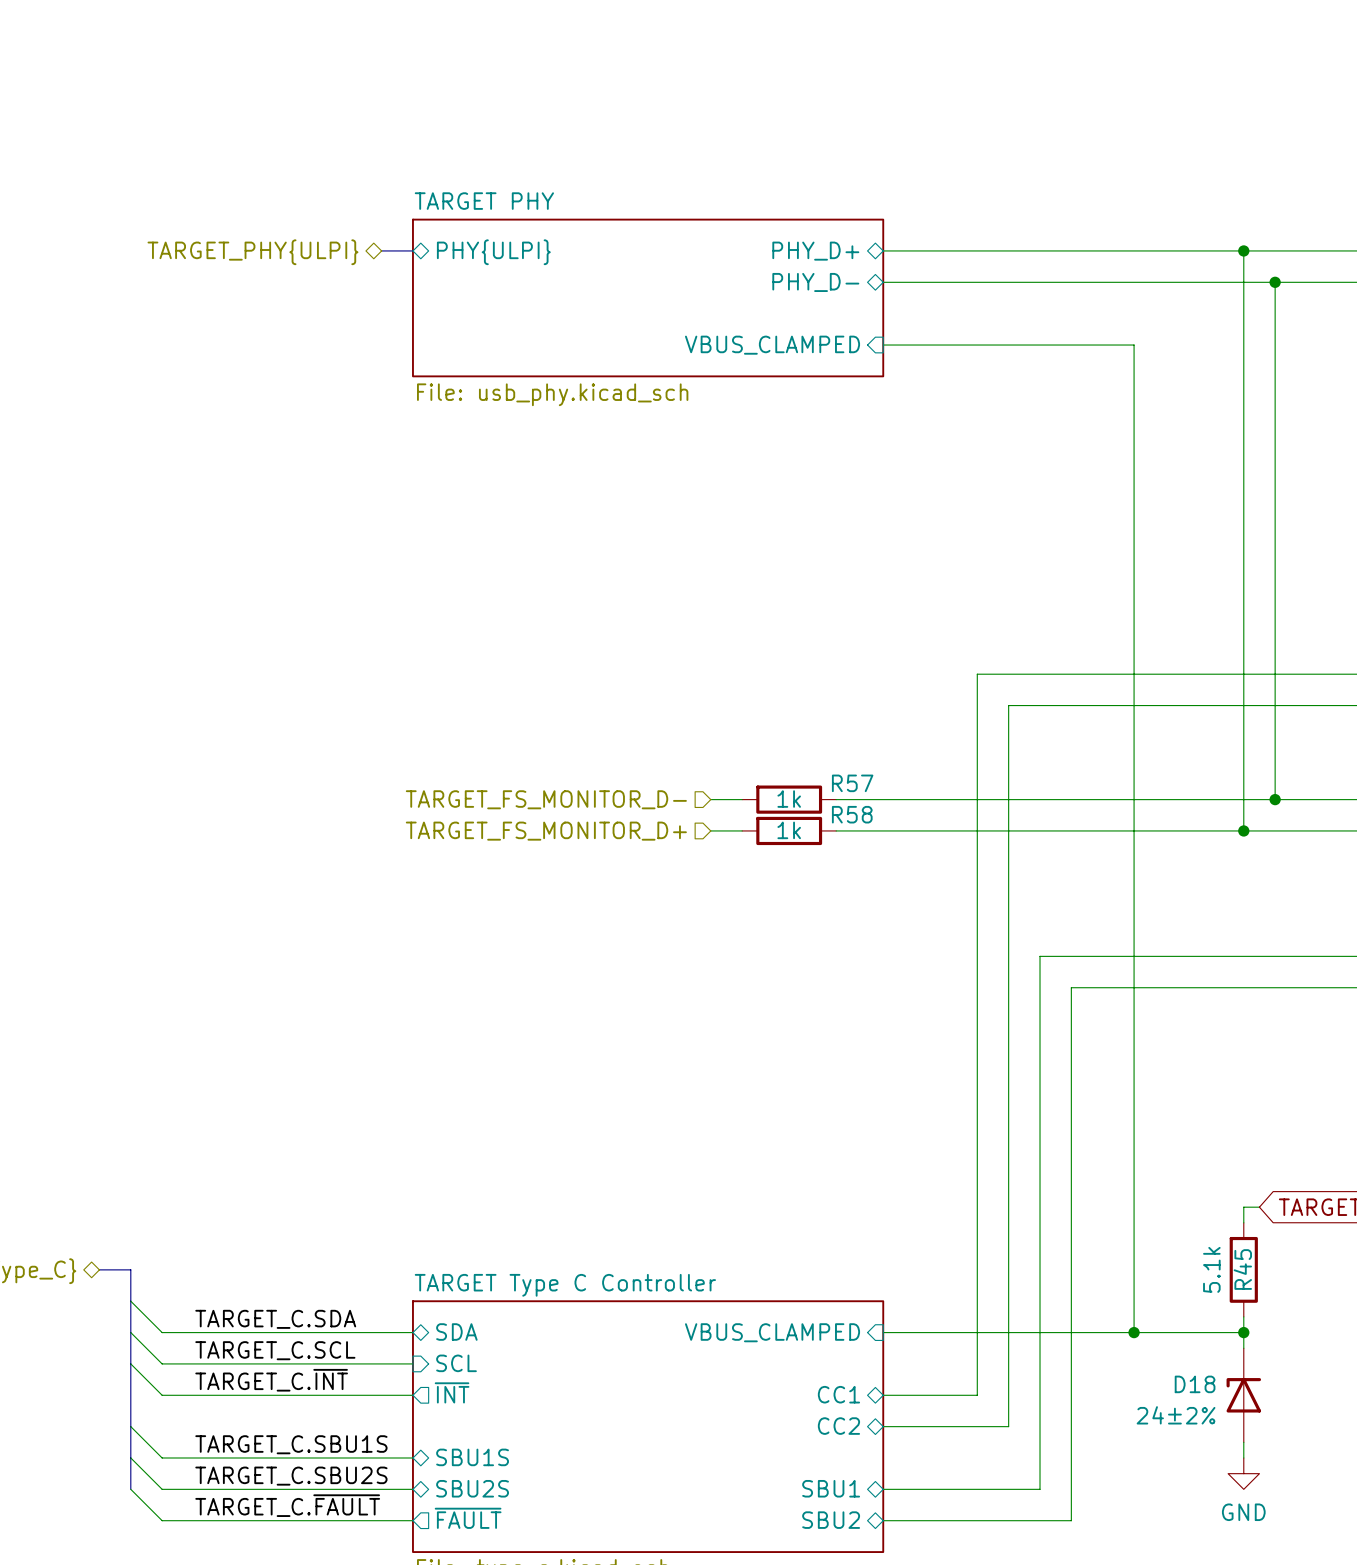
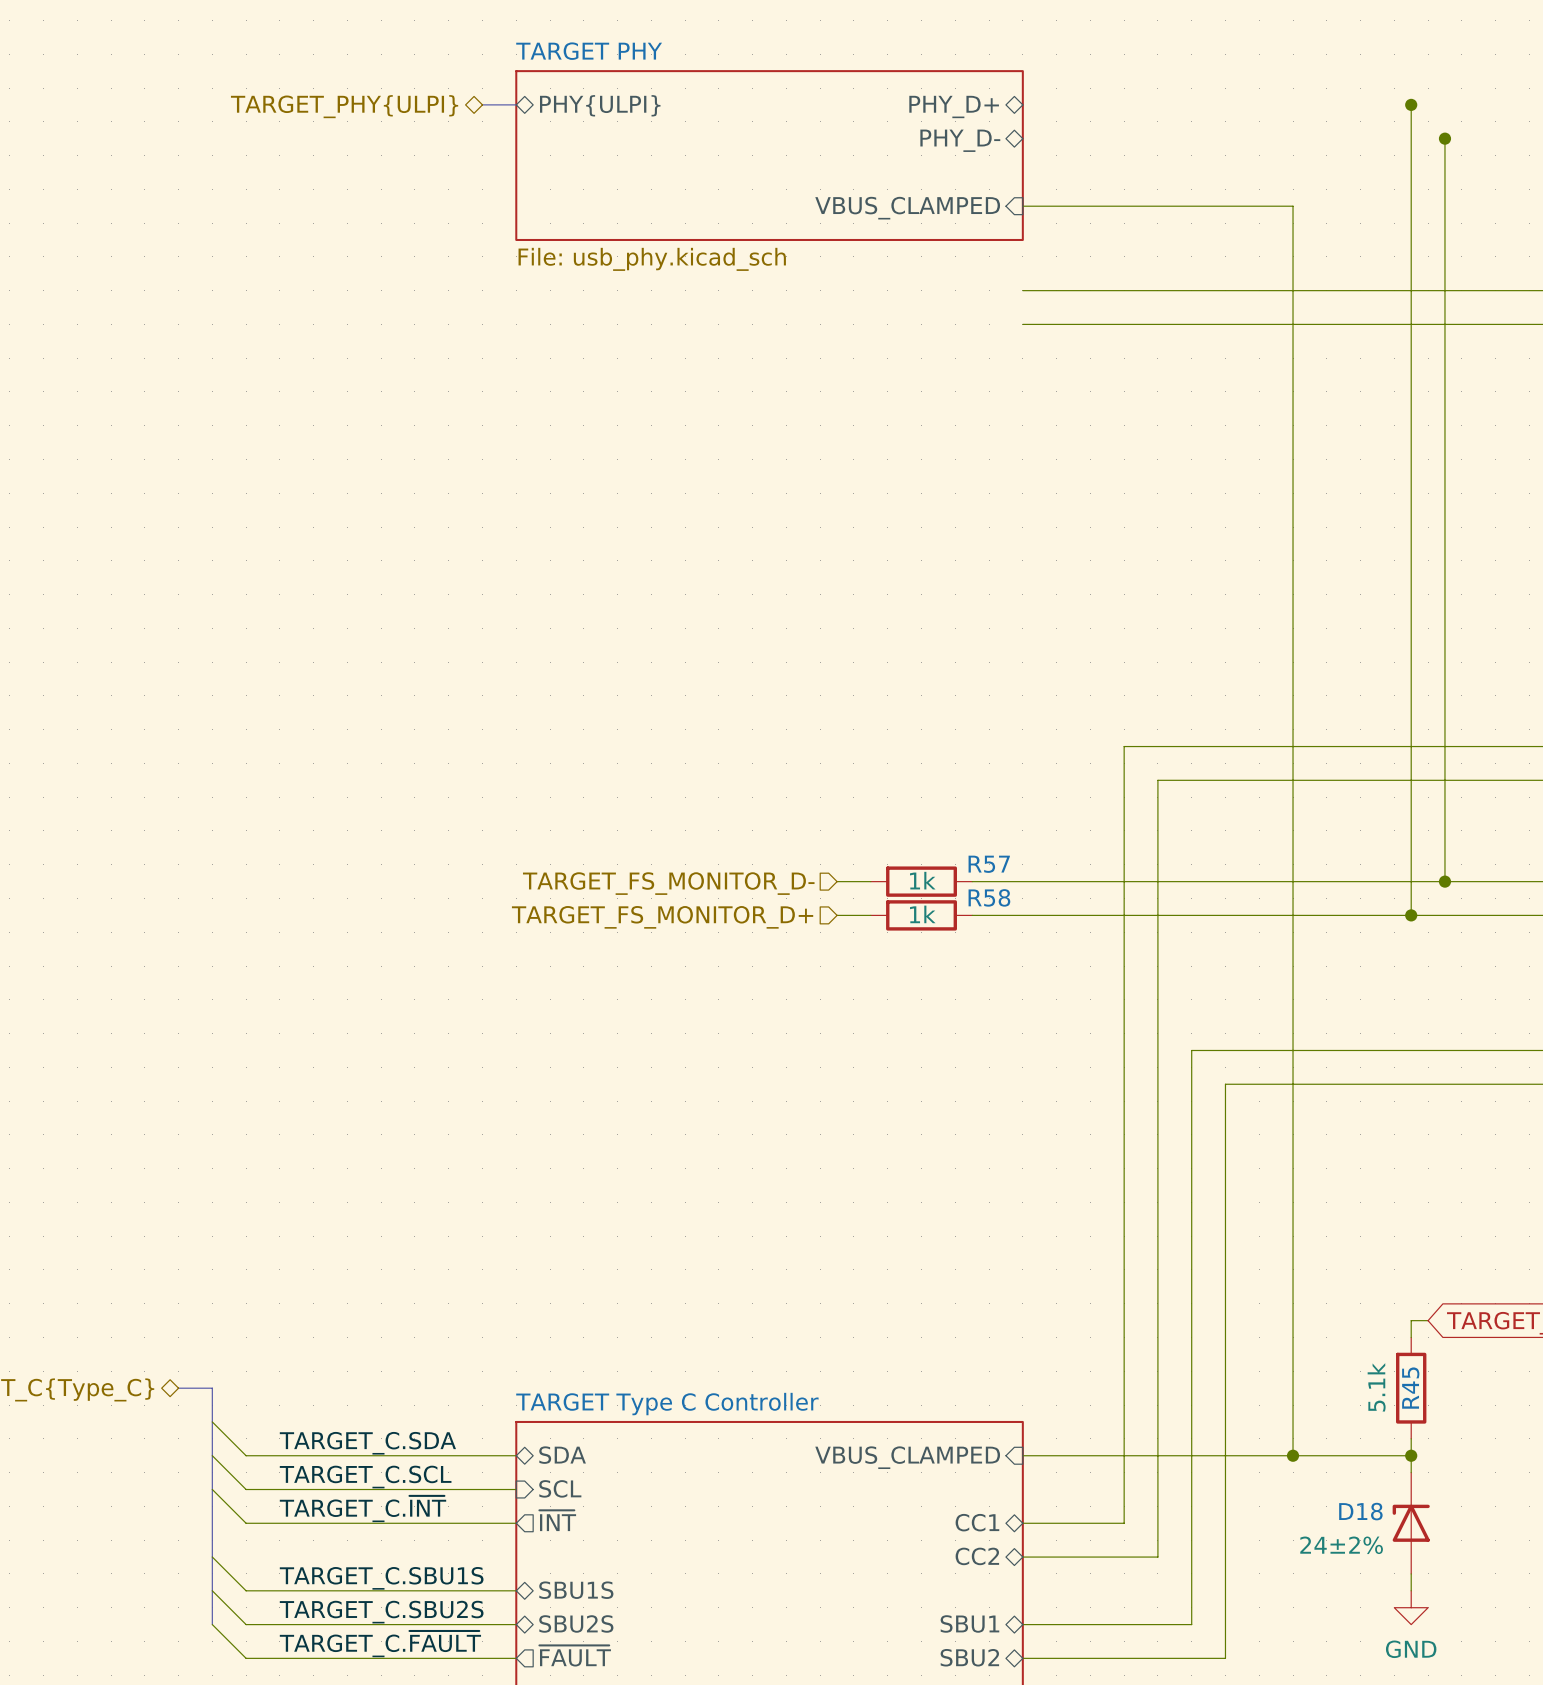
wire: none -> (1411, 104) (1411, 290)
junction: none -> (1411, 104)
wire: none -> (1444, 138) (1444, 324)
junction: none -> (1444, 138)
bus: (381, 250) (412, 250) -> (482, 104) (516, 104)
junction: (1243, 250) -> none
sheet pin position: PHY_D+ (815, 251) -> PHY_D+ (954, 106)
hierarchical label position: TARGET_PHY{ULPI} (252, 252) -> TARGET_PHY{ULPI} (344, 106)
sheet pin position: PHY{ULPI} (493, 252) -> PHY{ULPI} (600, 105)
sheet pin position: PHY_D- (815, 282) -> PHY_D- (960, 140)
junction: (1275, 282) -> none
sheet TARGET PHY position: (648, 297) -> (769, 155)
sheet pin position: VBUS_CLAMPED (772, 345) -> VBUS_CLAMPED (907, 208)
wire: (883, 345) (1134, 345) -> (1022, 206) (1293, 206) (1293, 391)

